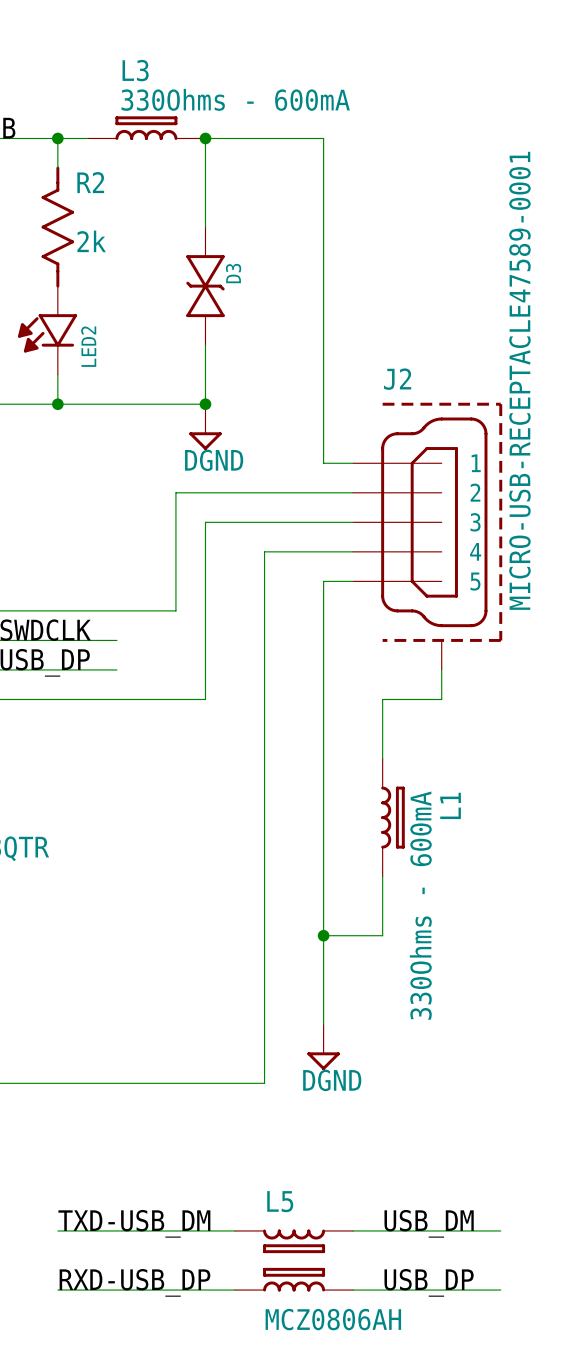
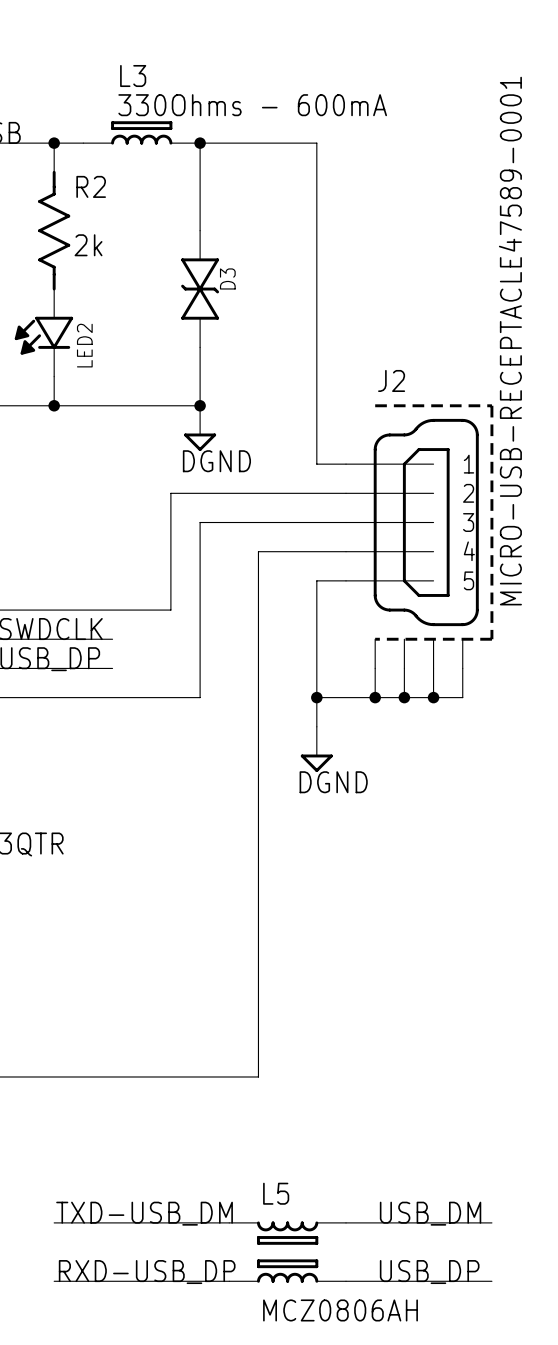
J2 symbol: [353, 402, 503, 670] -> [346, 404, 494, 669]
wire: none -> (375, 668) (375, 697) (316, 697)
wire: none -> (404, 668) (404, 697)
wire: none -> (462, 668) (462, 697) (433, 697)
junction: none -> (316, 697)
wire: (382, 699) (382, 758) -> none
junction: none -> (375, 697)
junction: none -> (404, 697)
junction: none -> (433, 697)
wire: (323, 729) (323, 1024) -> none
power symbol: none -> DGND (316, 749)
L1: 330Ohms - 600mA (392, 817) -> none
wire: (382, 876) (382, 935) (323, 935) -> none
junction: (323, 935) -> none
power symbol: DGND (323, 1047) -> none

